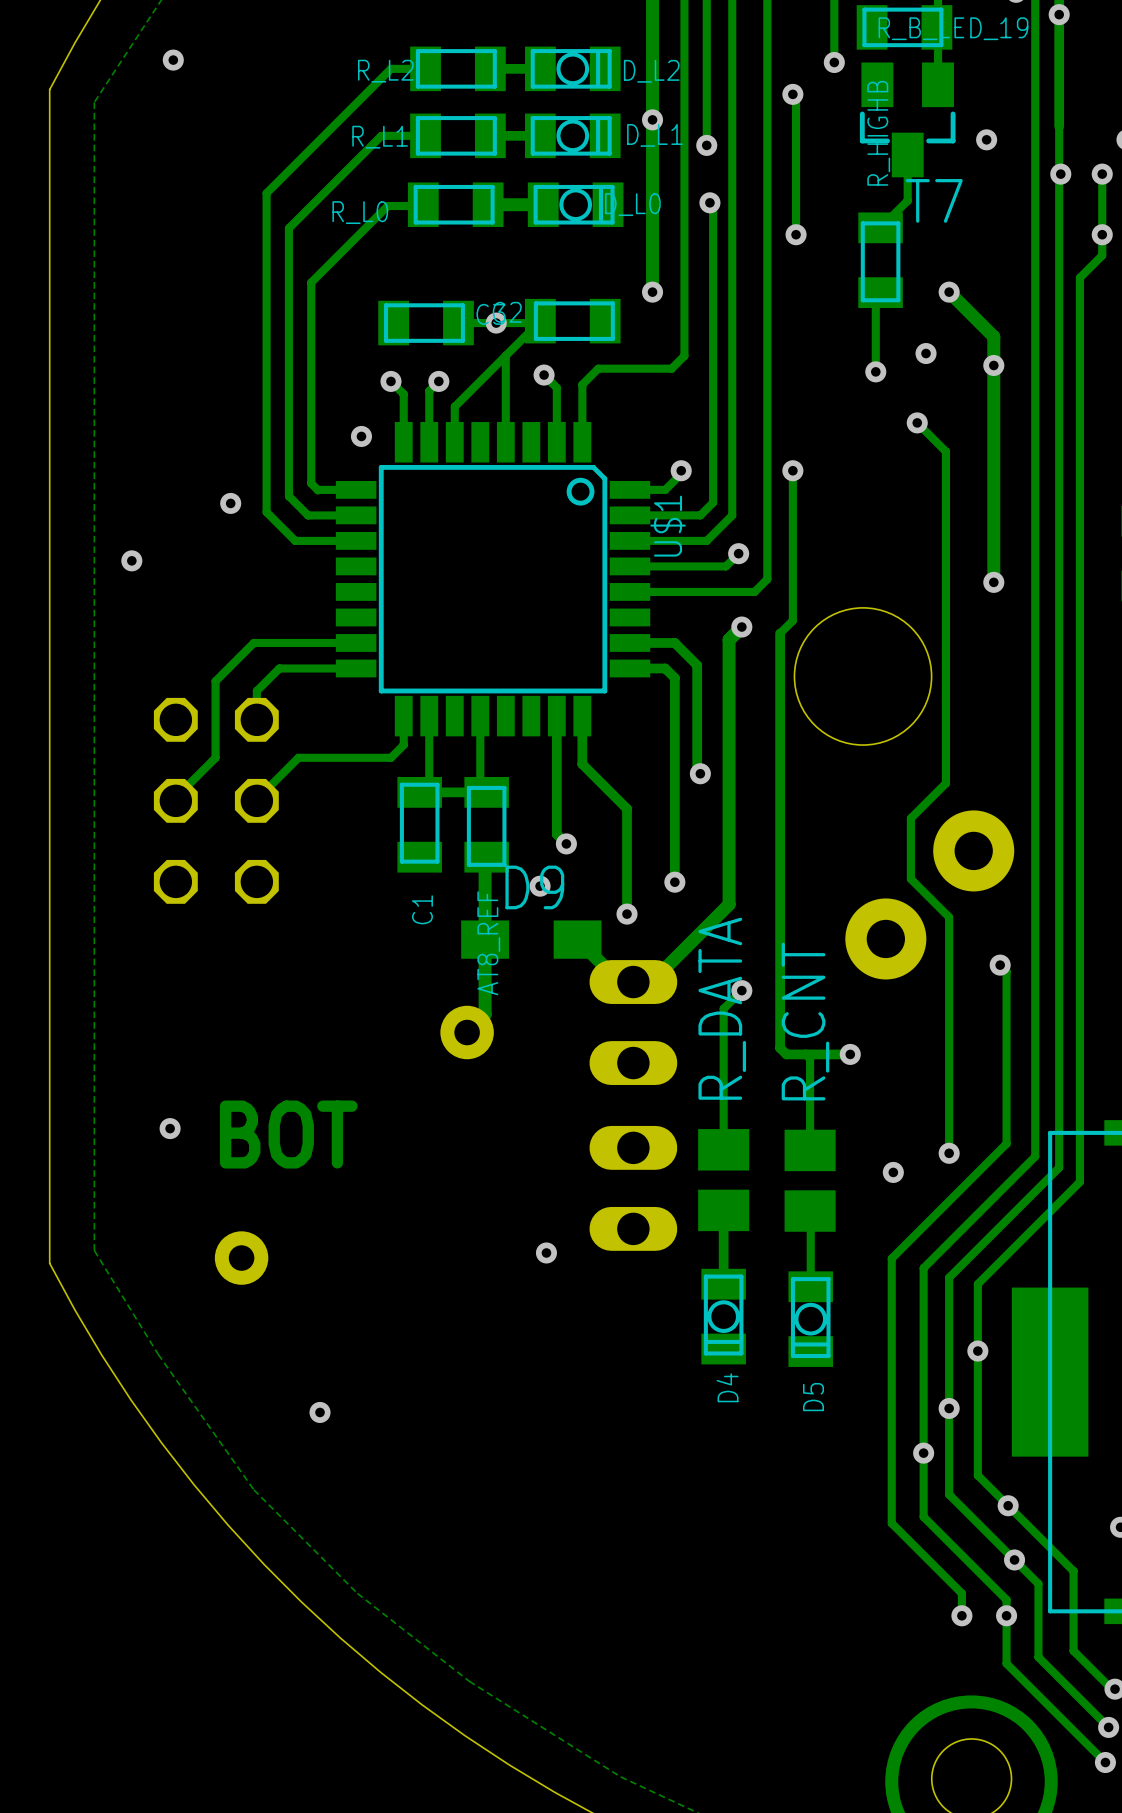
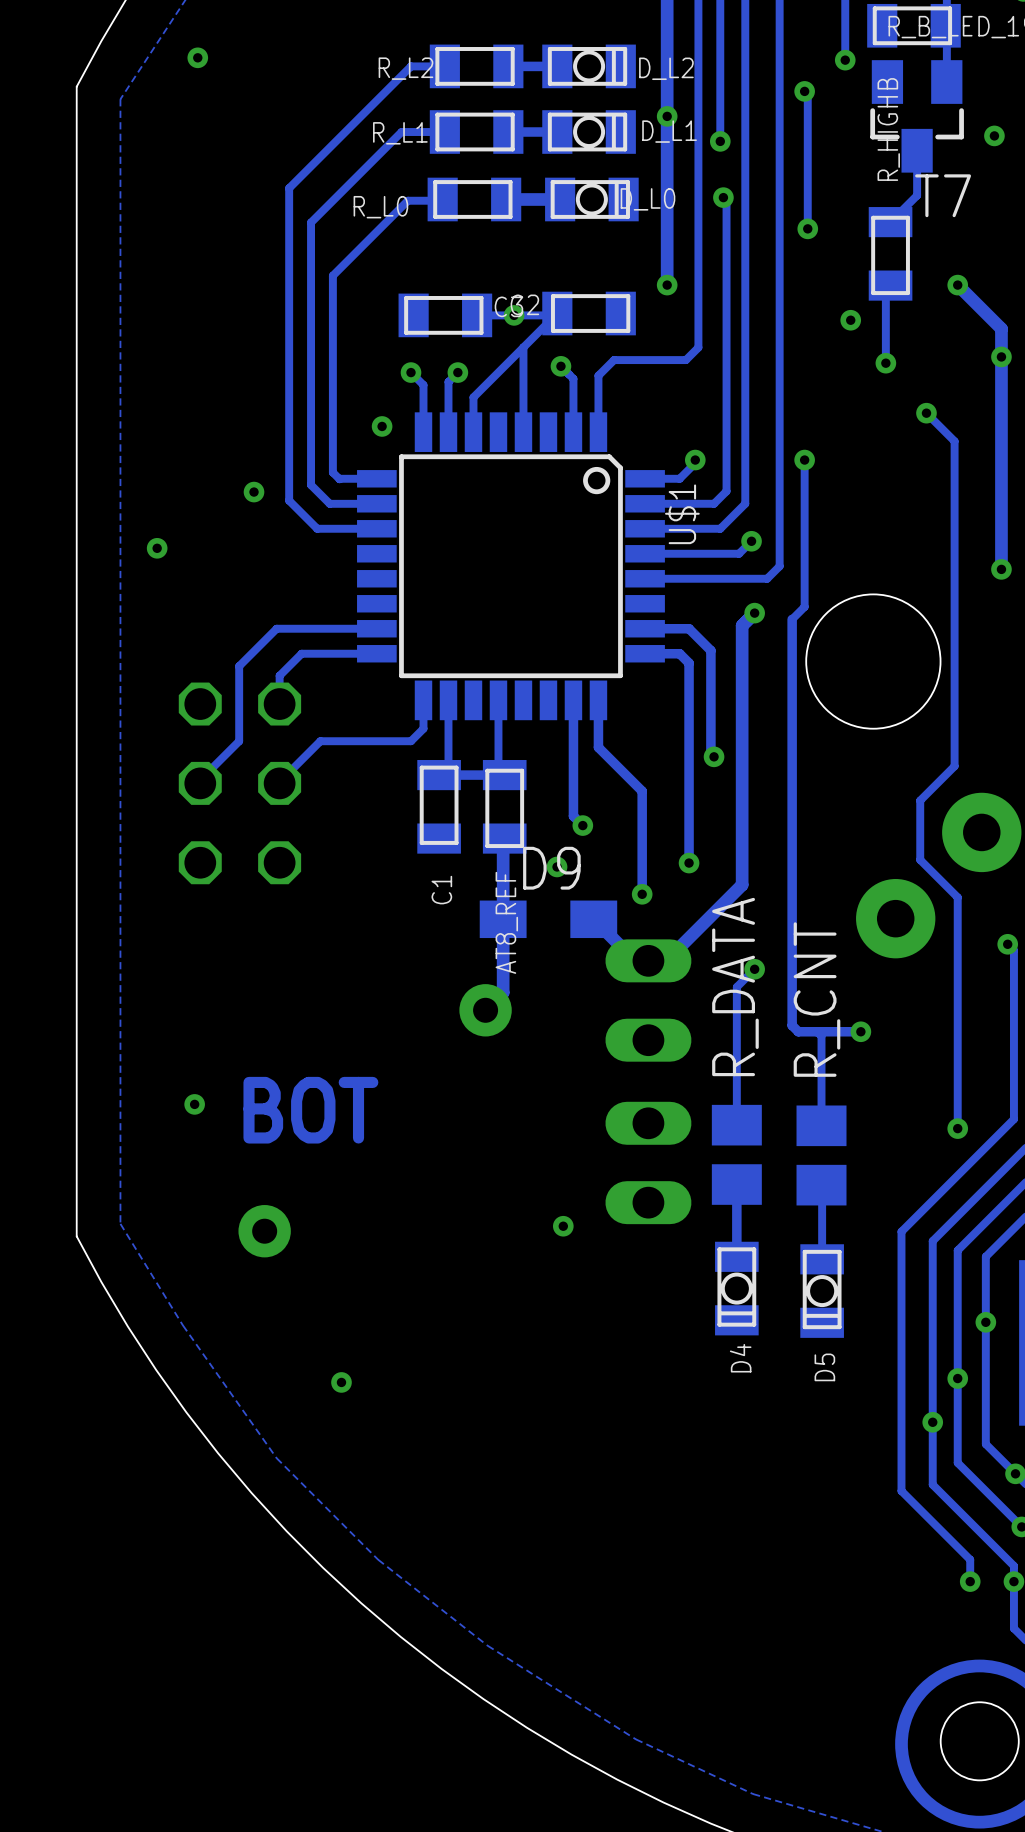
via position: (926, 353) -> (850, 320)
via: (893, 1172) -> none

